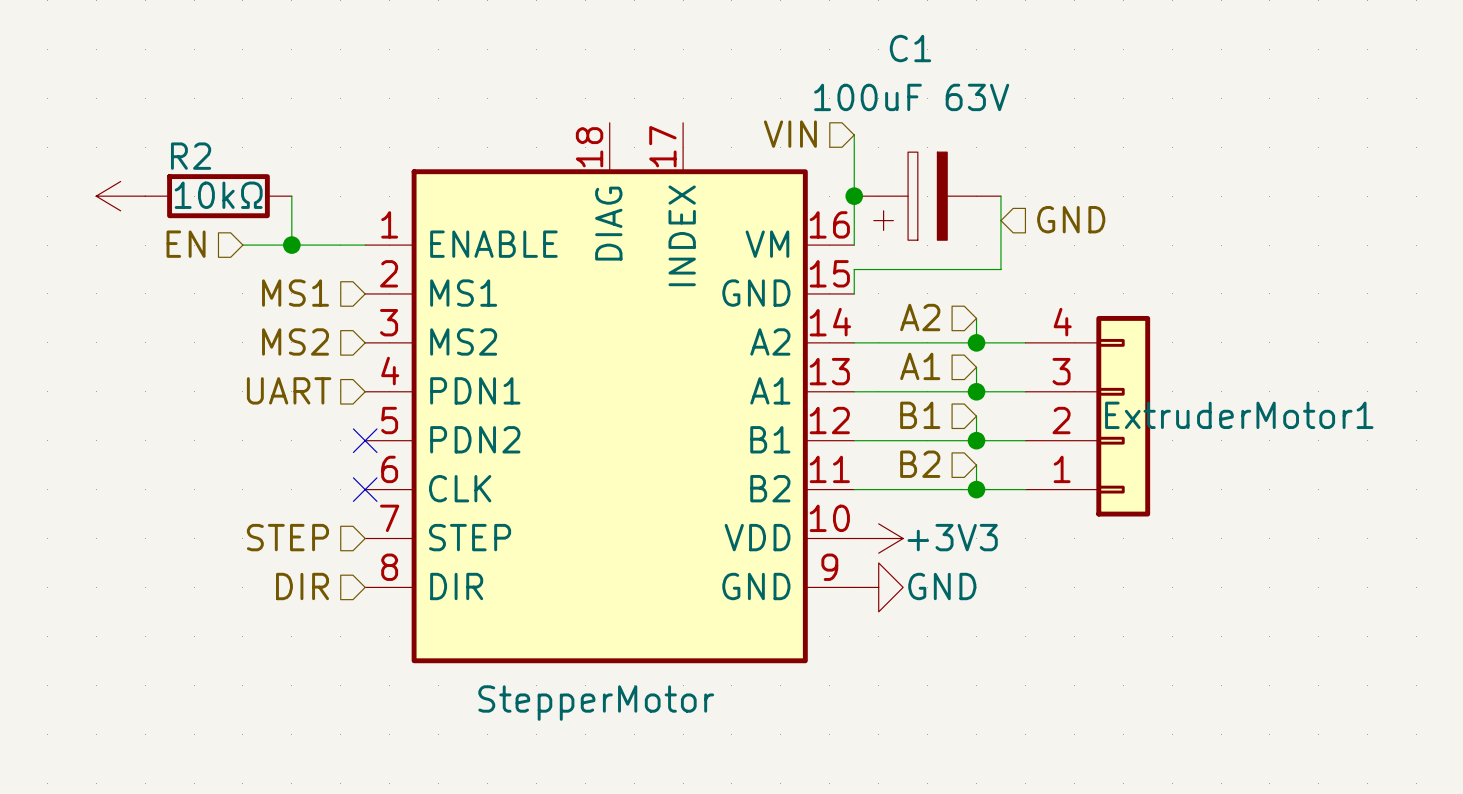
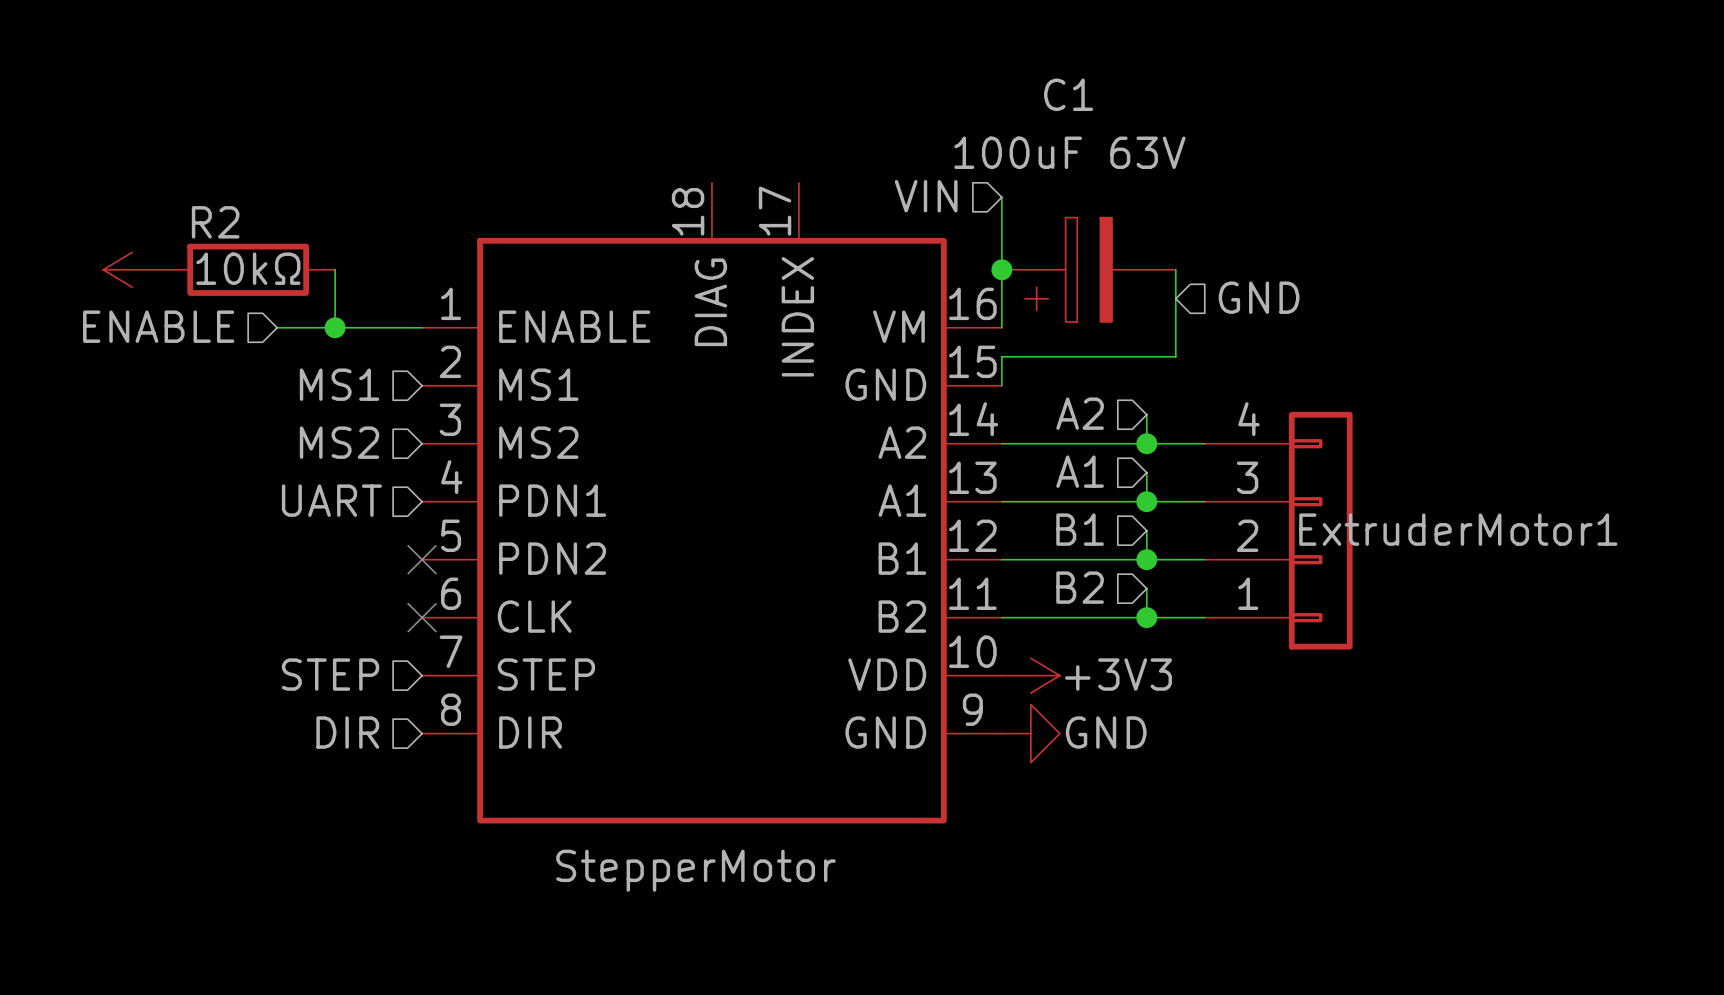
hierarchical label: EN (186, 244) -> ENABLE (158, 326)

